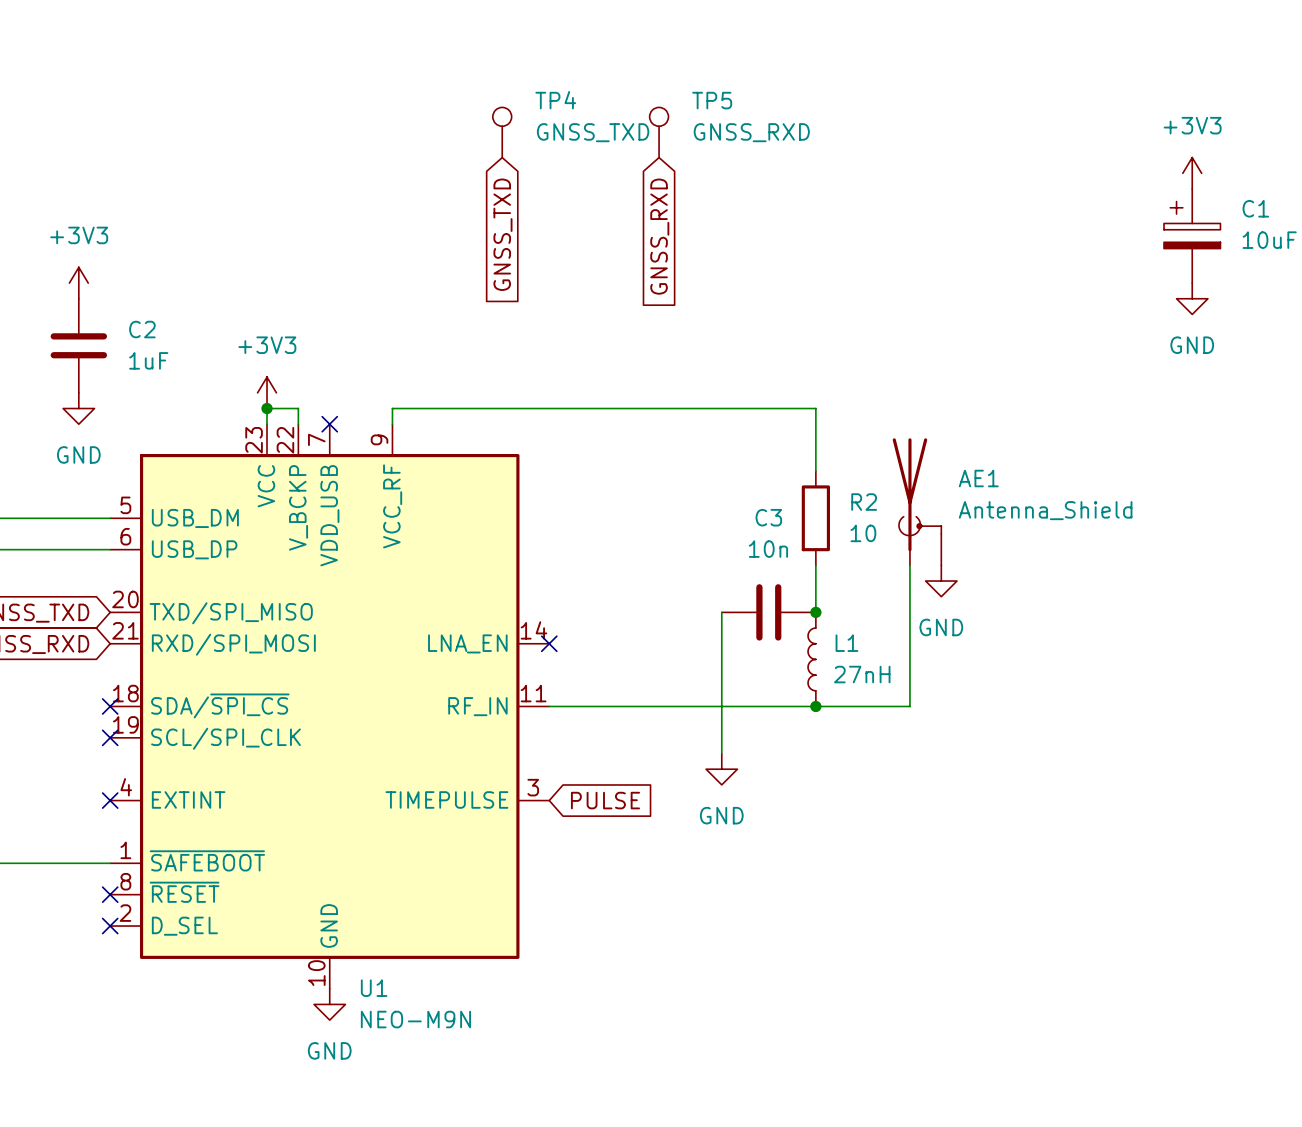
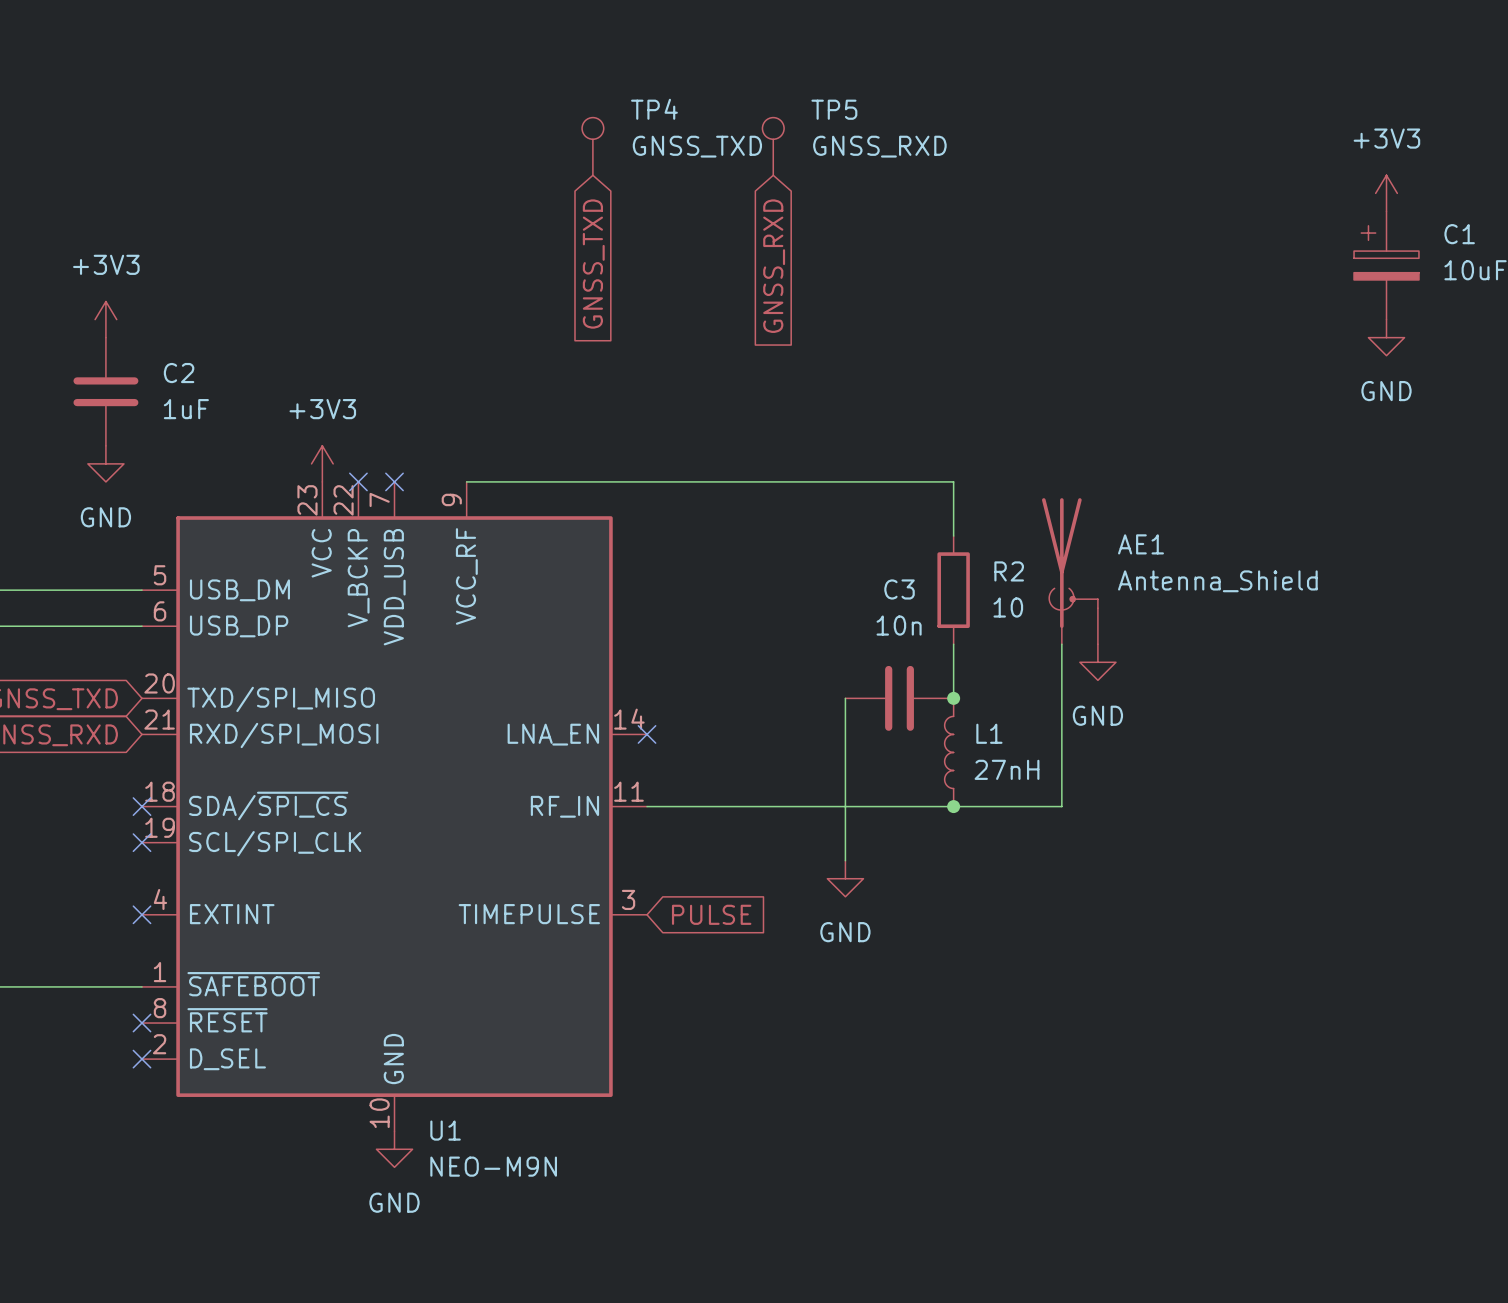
power symbol position: +3V3 (267, 392) -> +3V3 (322, 463)
junction: (267, 408) -> none
wire: (267, 424) (267, 408) (298, 408) (298, 424) -> none
no-connect mark: none -> (358, 481)
wire: (392, 424) (392, 408) (815, 408) (815, 424) -> (466, 481) (953, 481)

